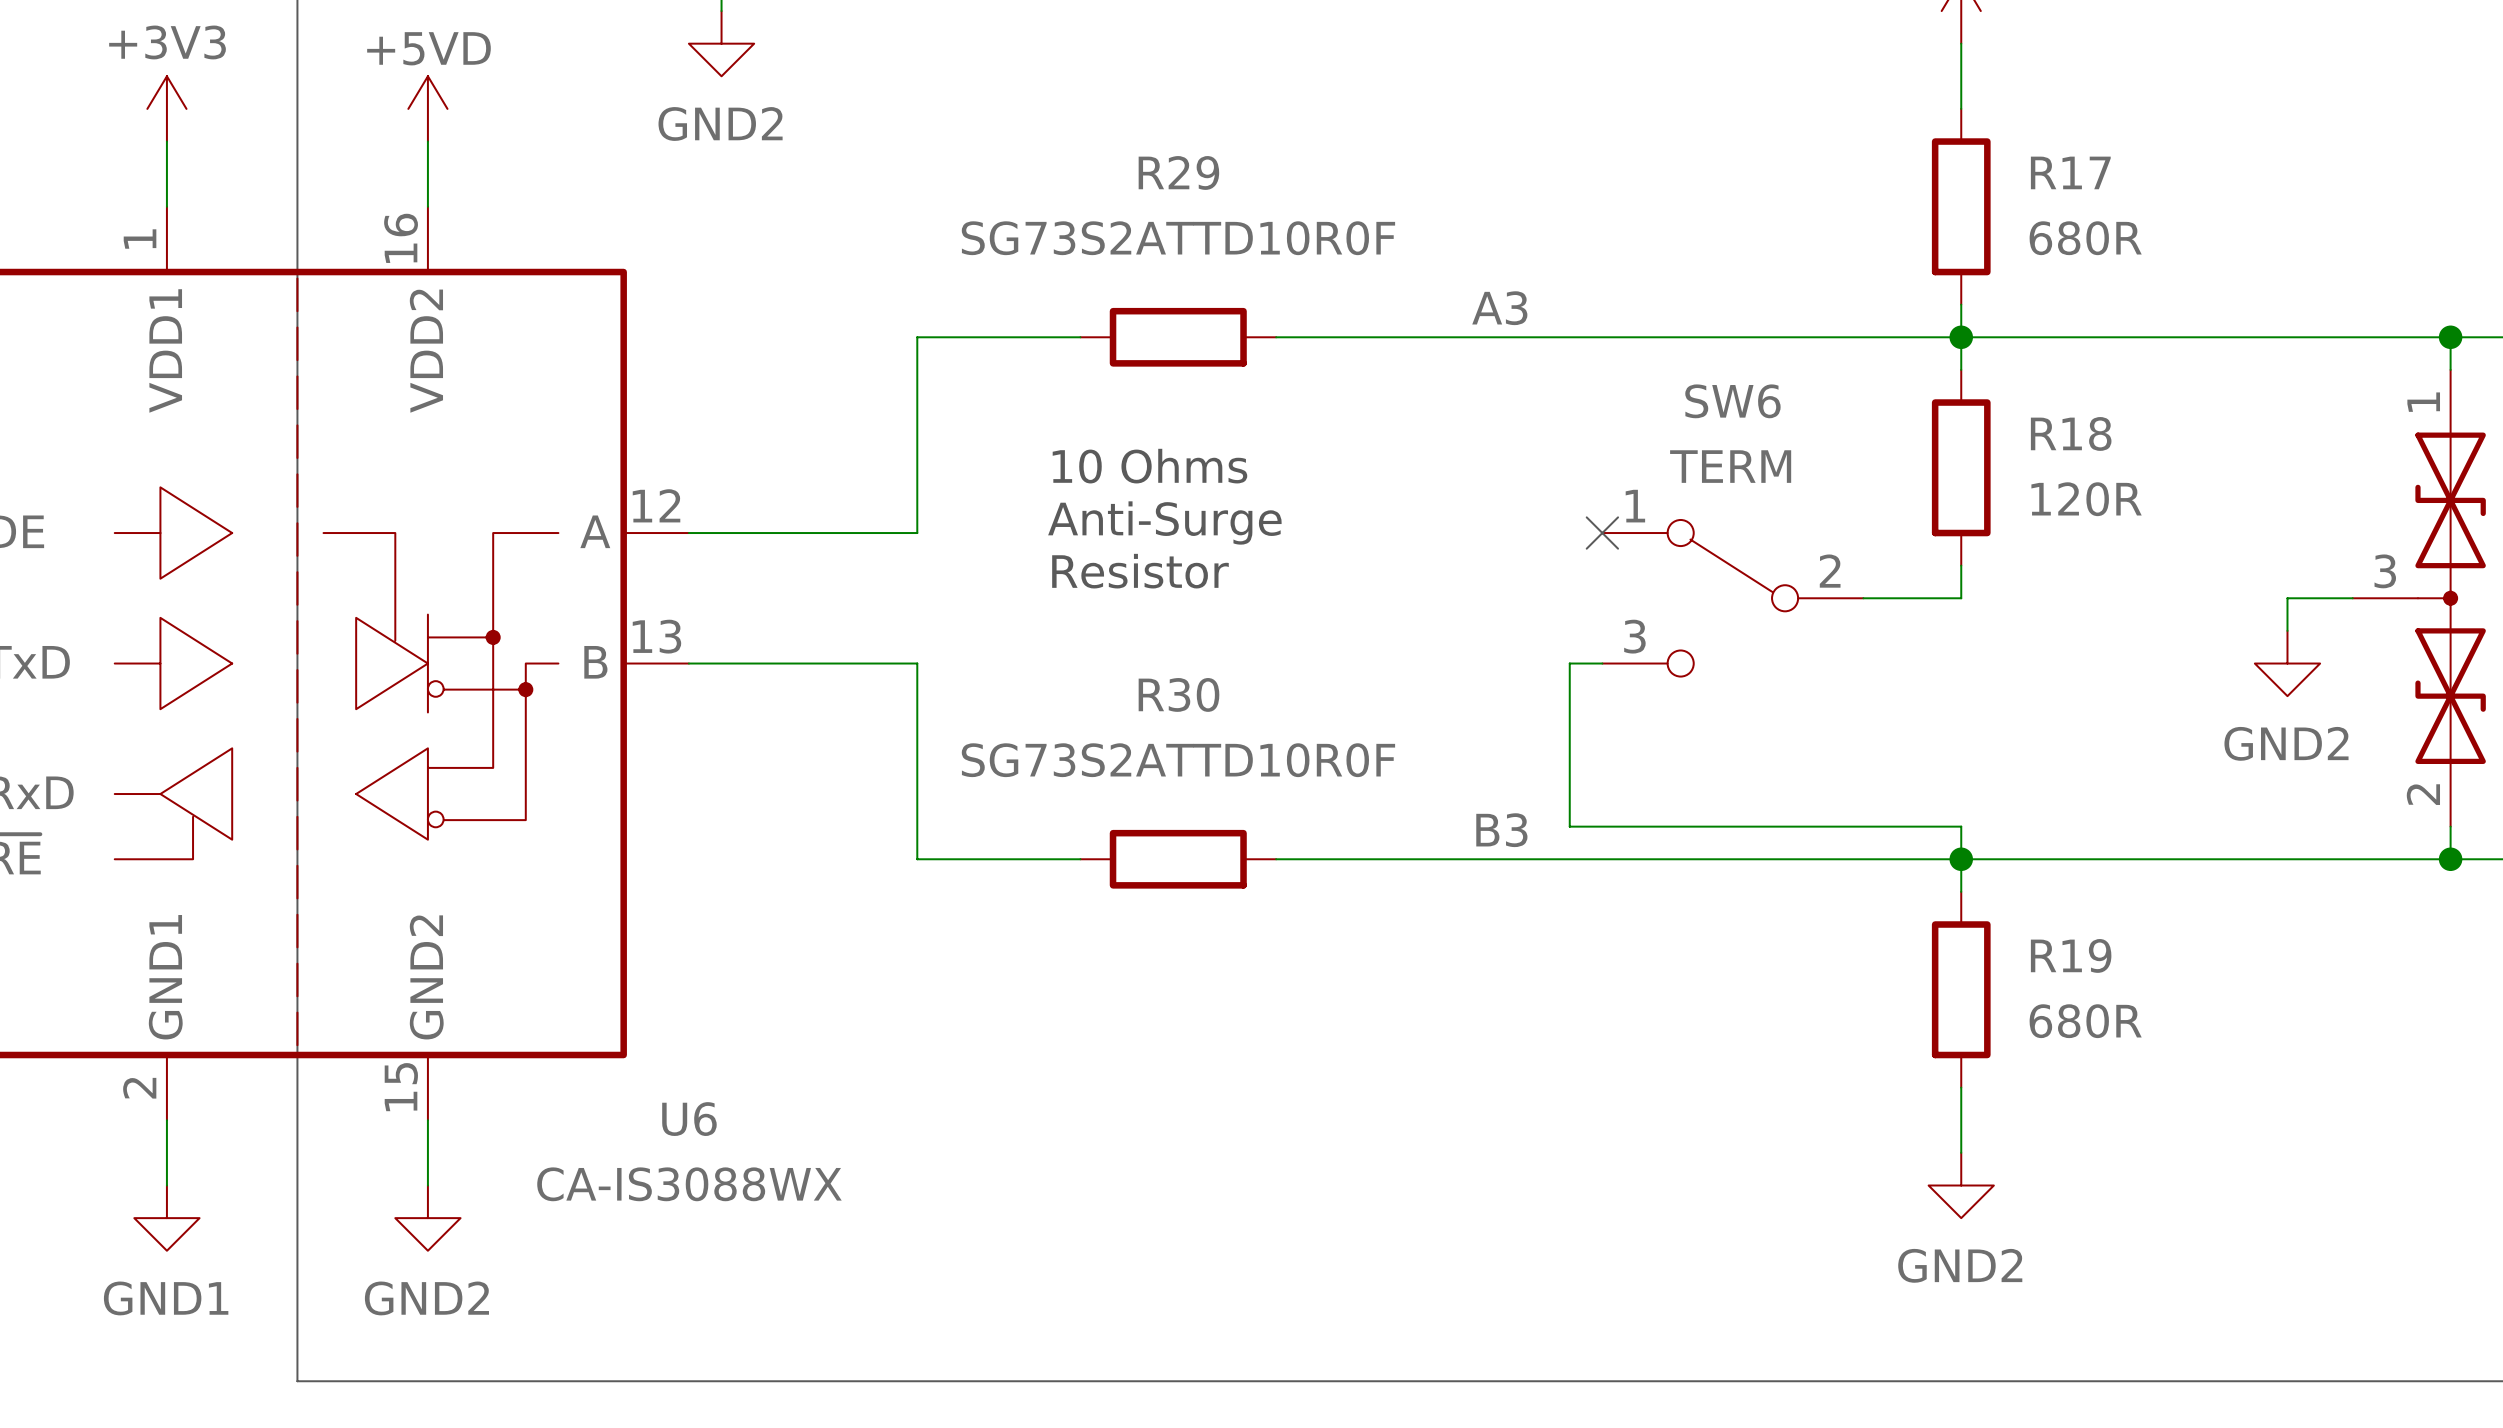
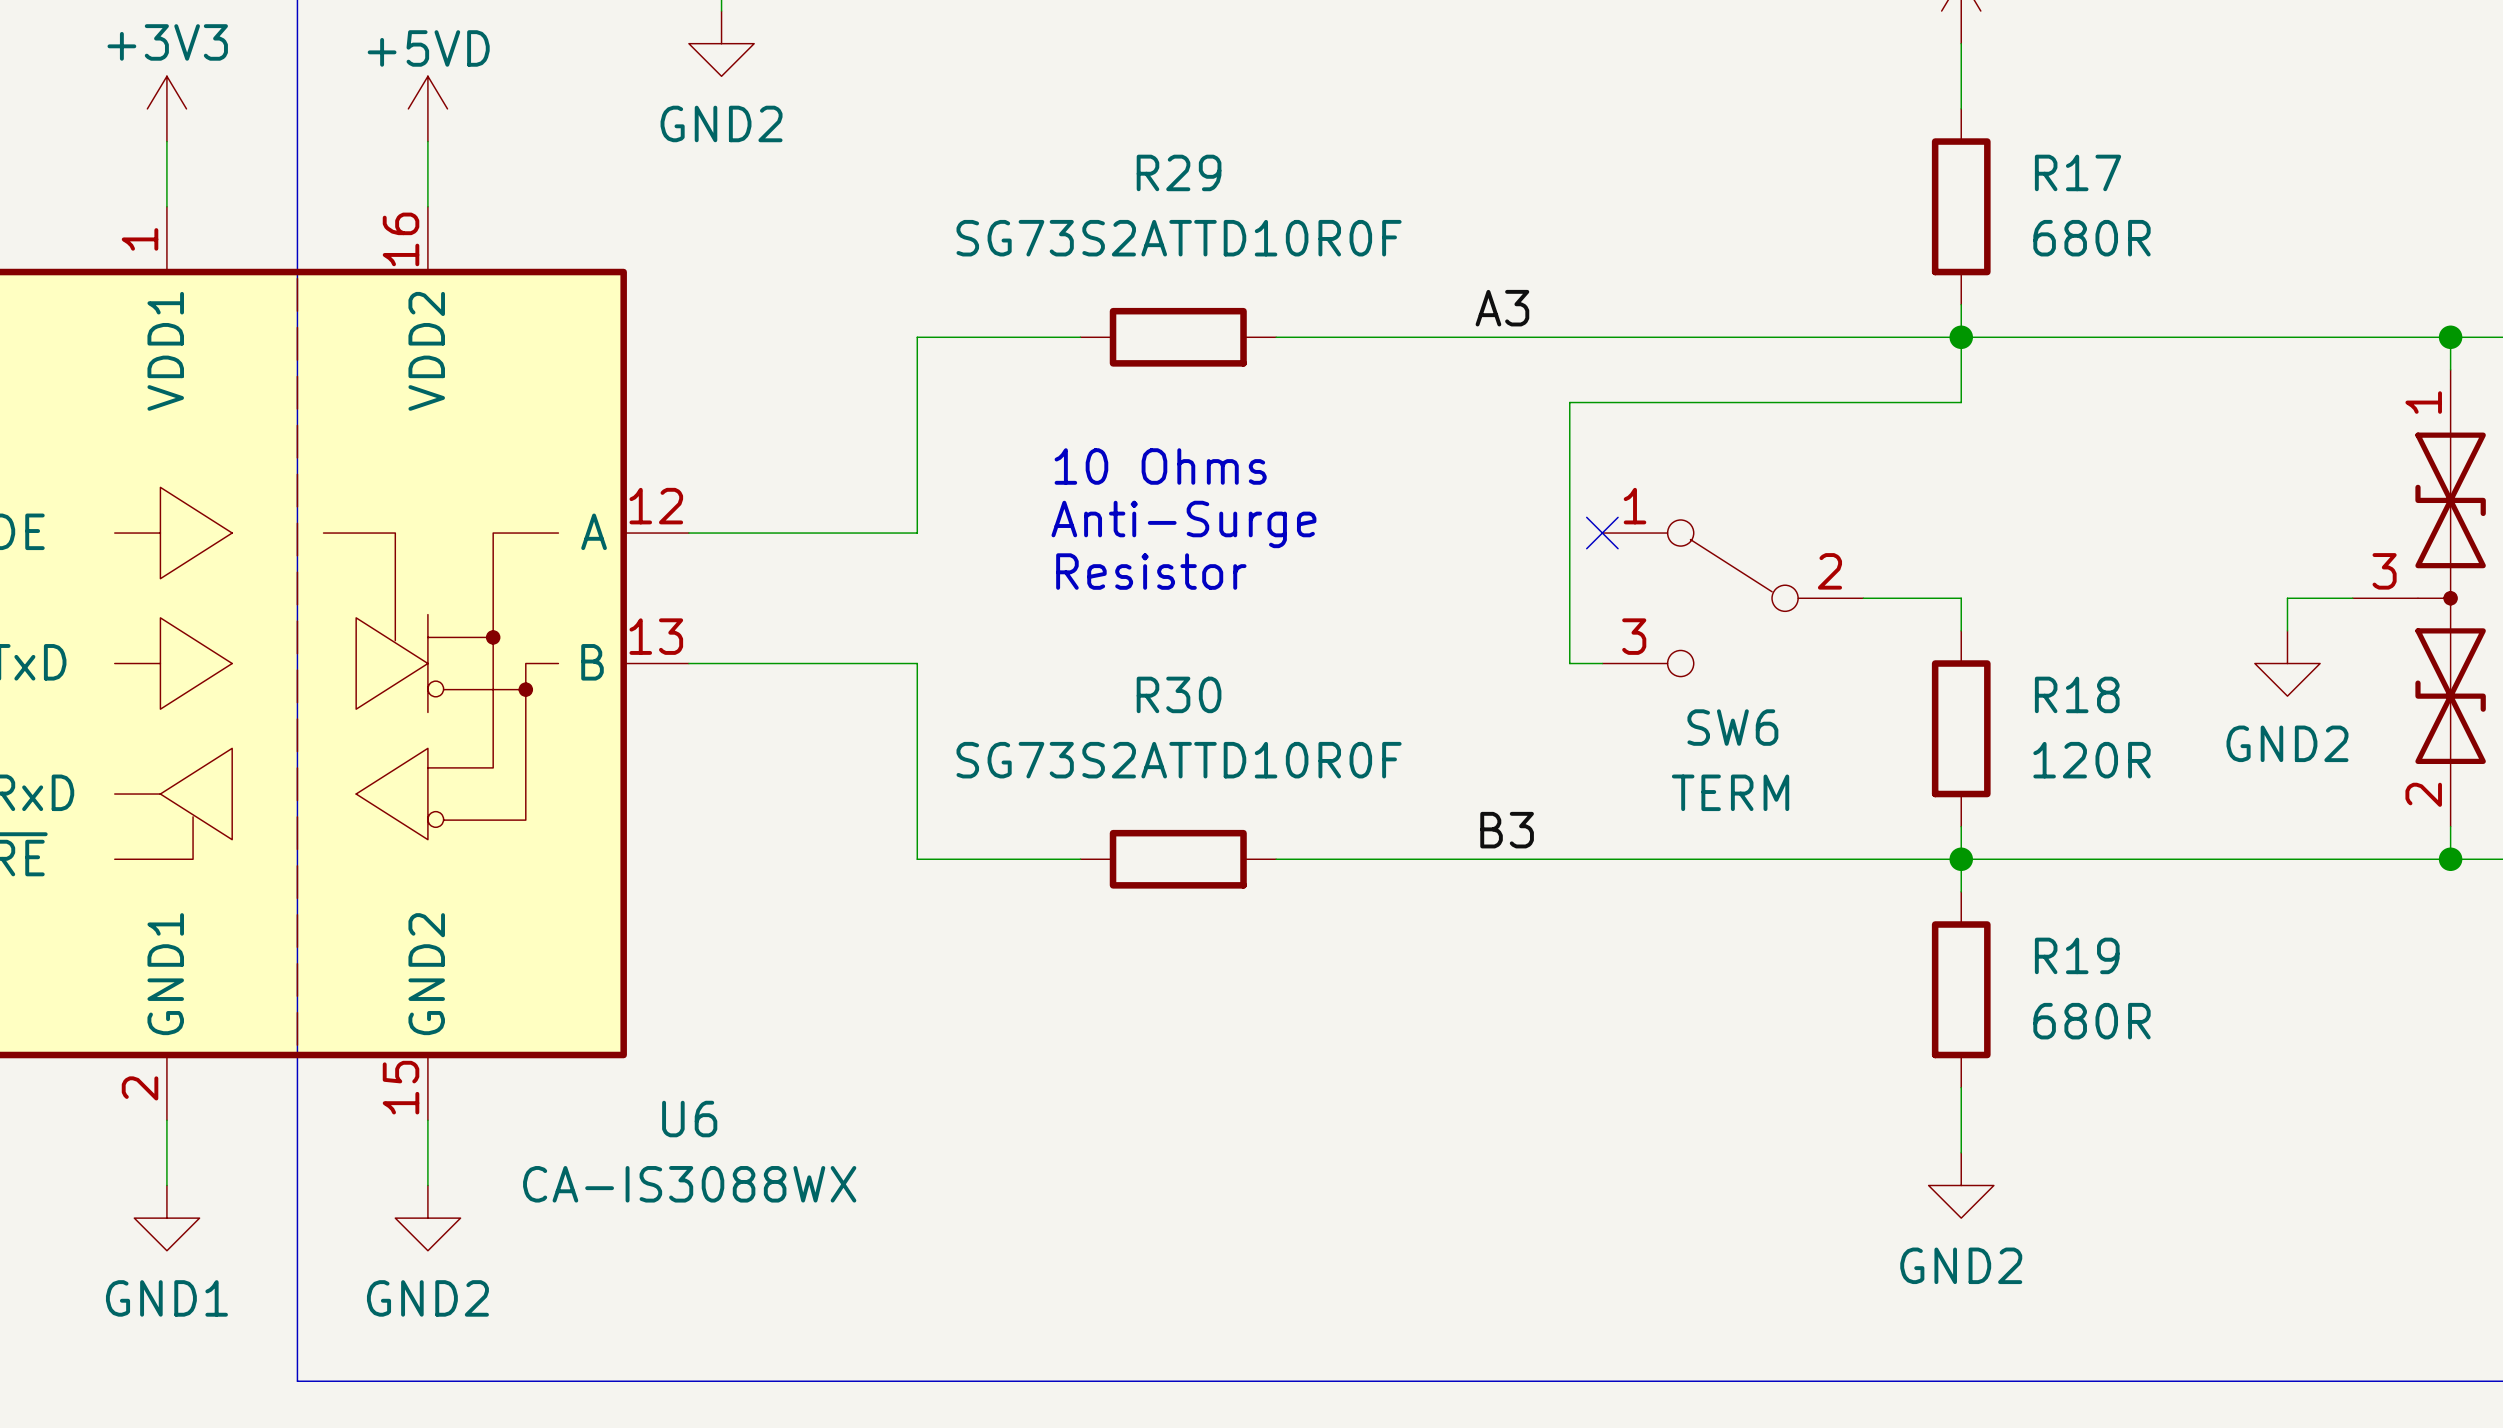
SW6 name position: SW6 (1732, 401) -> SW6 (1732, 727)
SW6 value position: TERM (1730, 466) -> TERM (1730, 792)
R18 position: (1961, 467) -> (1961, 728)
wire: (1961, 565) (1961, 598) -> (1961, 630) (1961, 598)
wire: (1569, 663) (1569, 826) (1961, 826) -> (1569, 663) (1569, 402) (1961, 402) (1961, 369)

